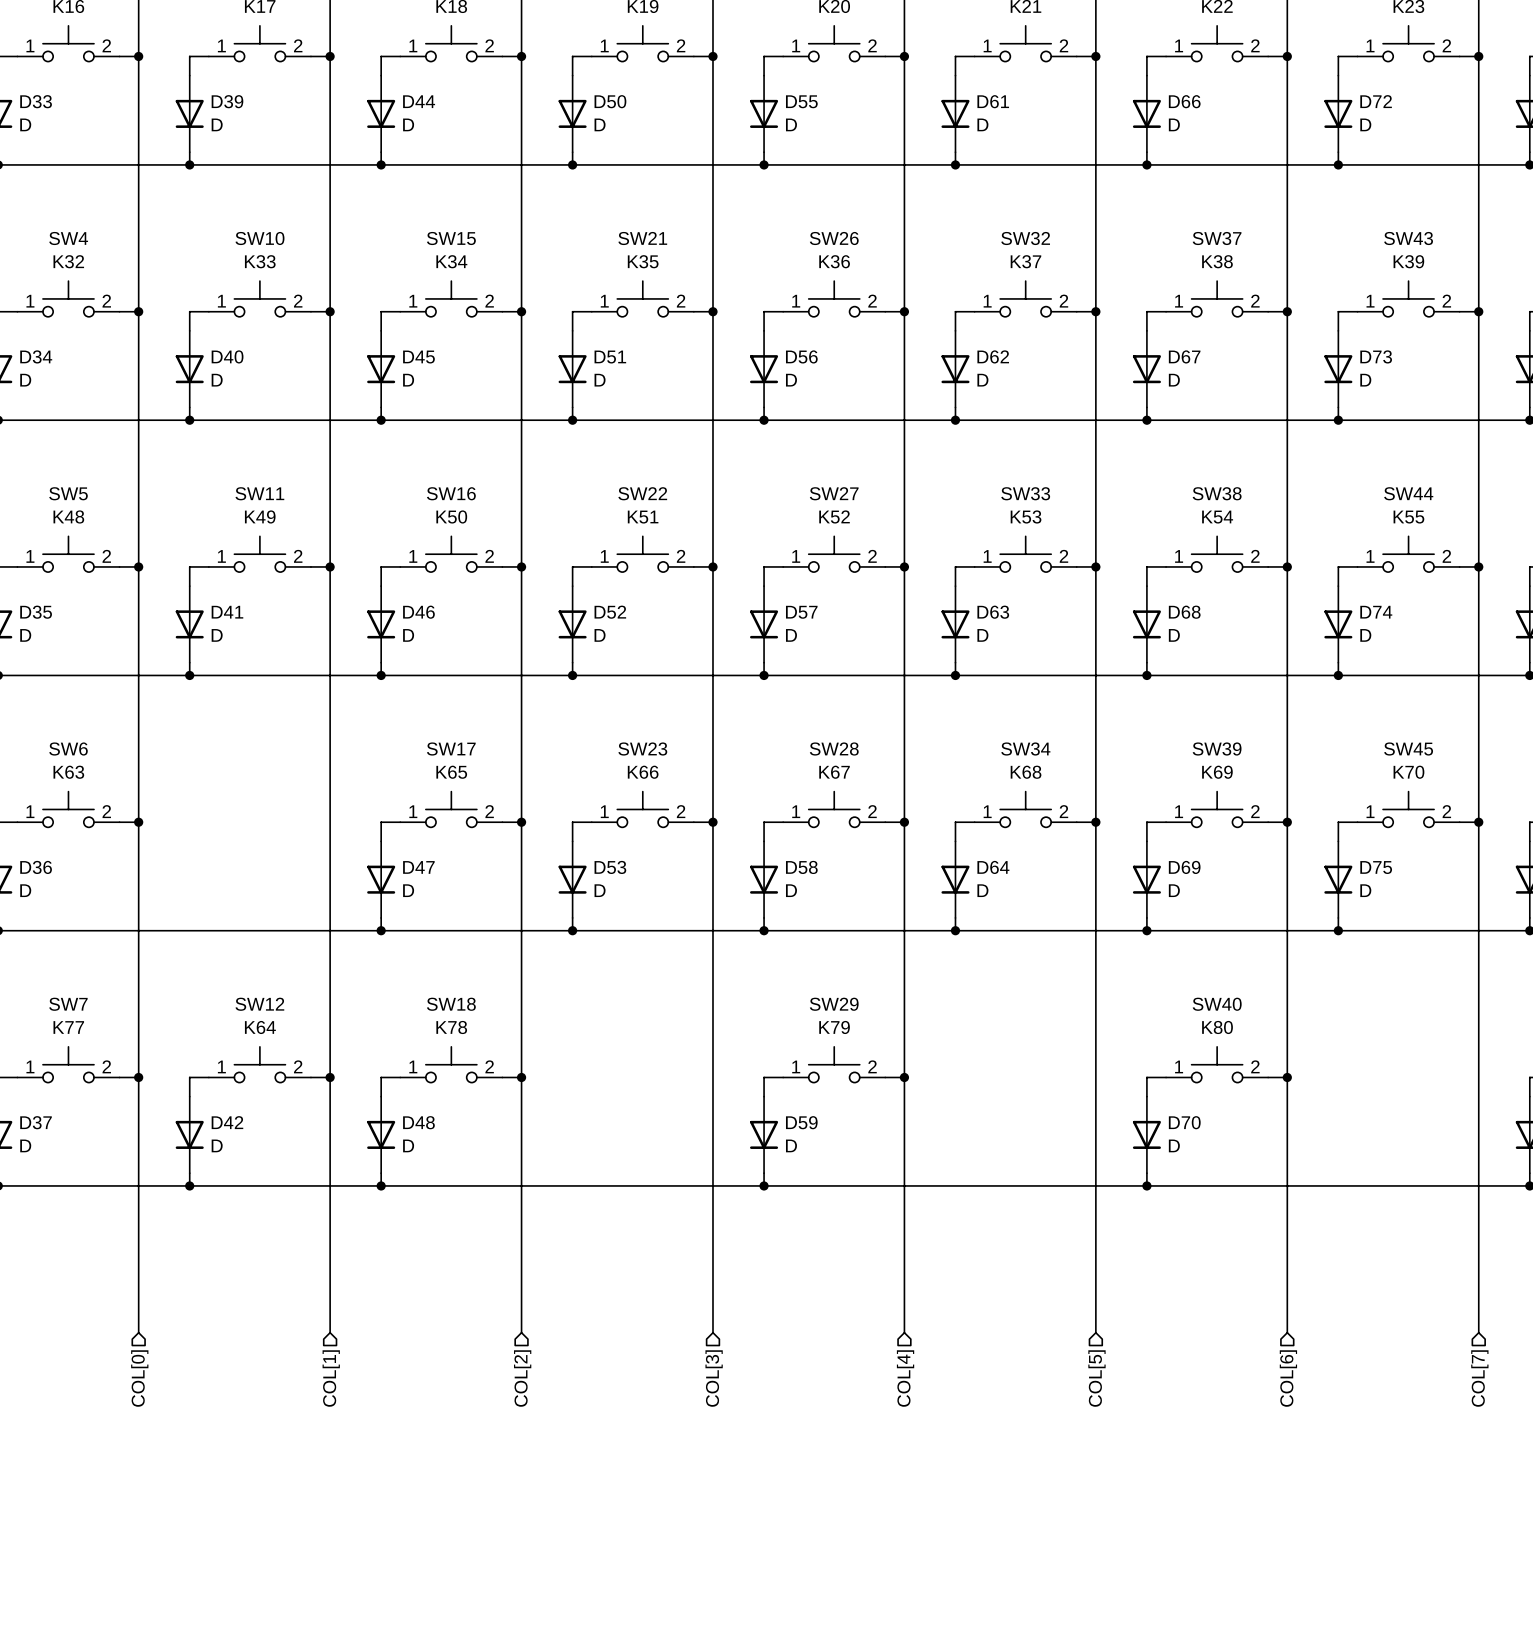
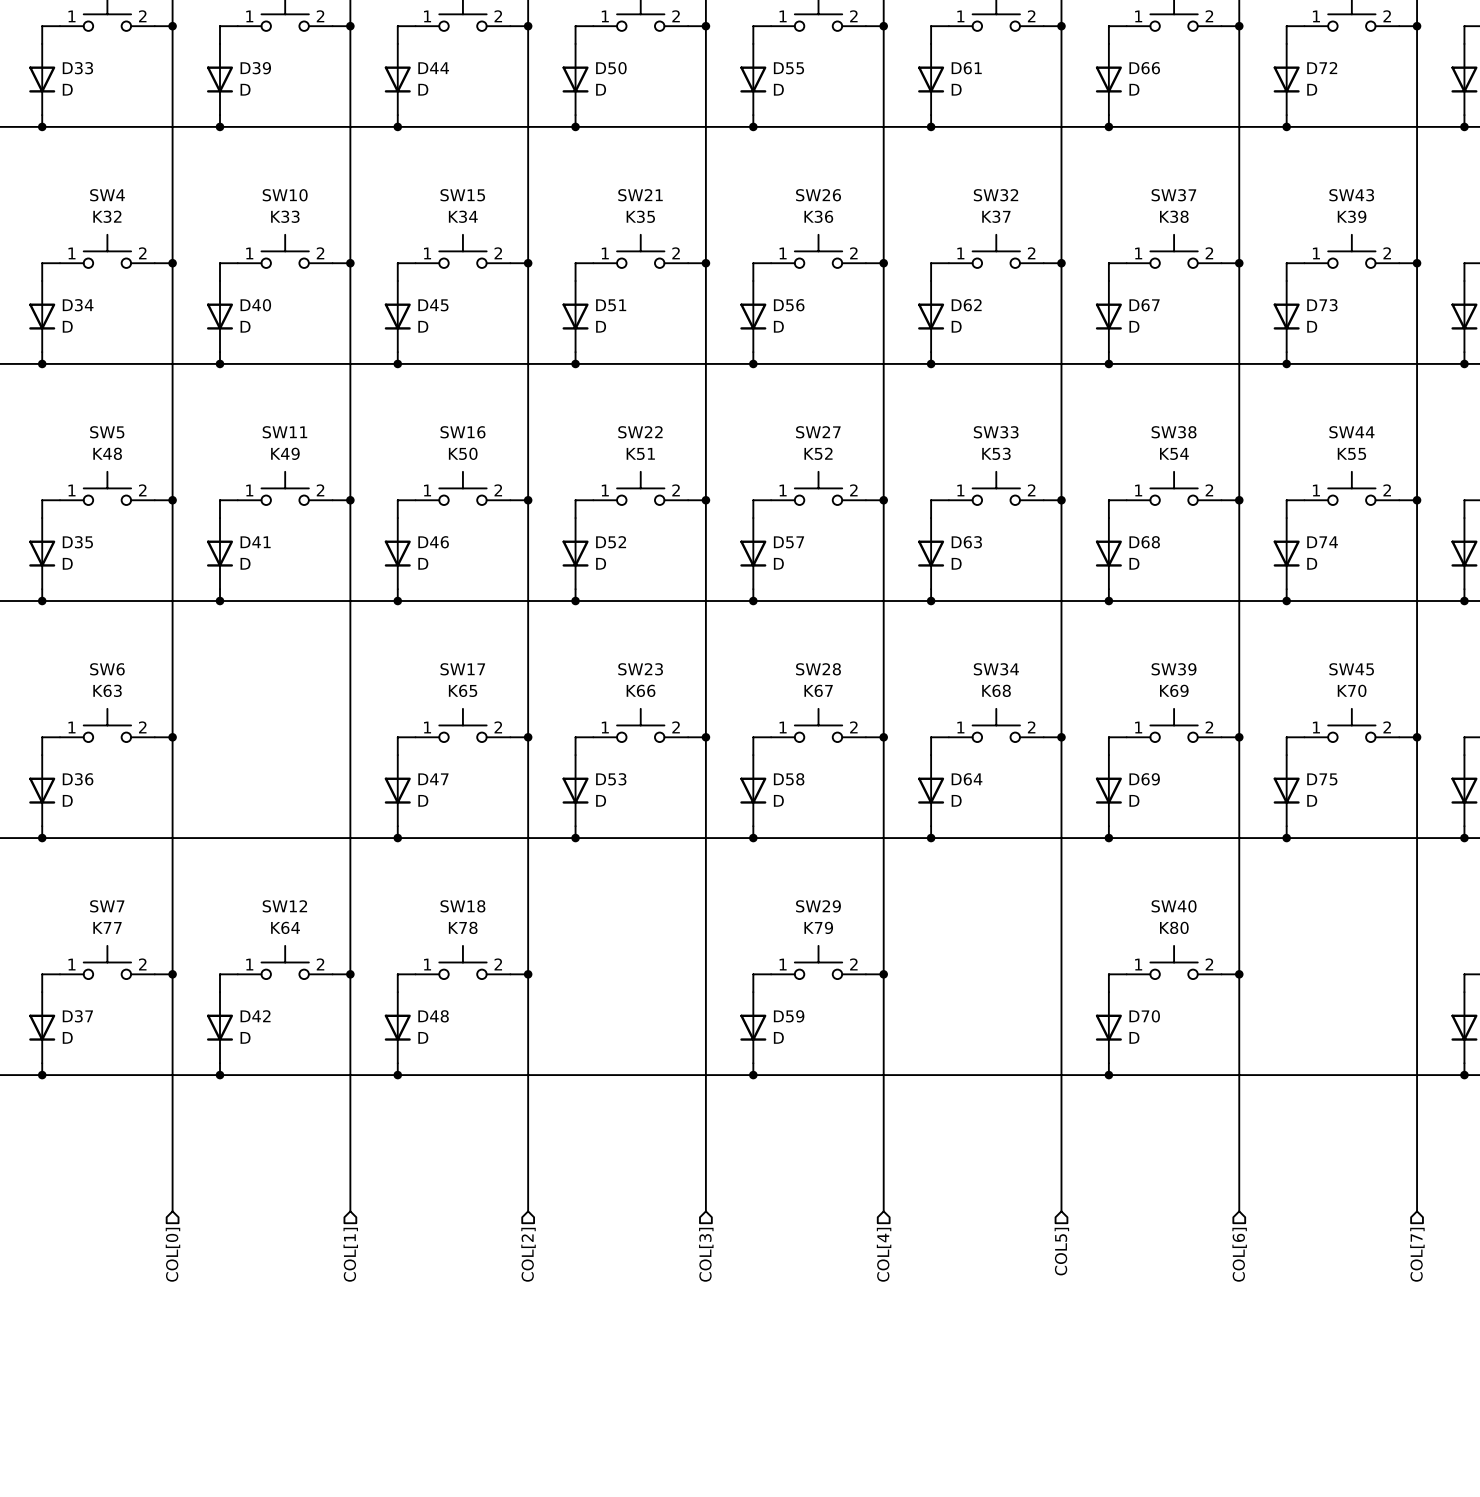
hierarchical label: COL[5] (1096, 1378) -> COL5] (1061, 1251)

